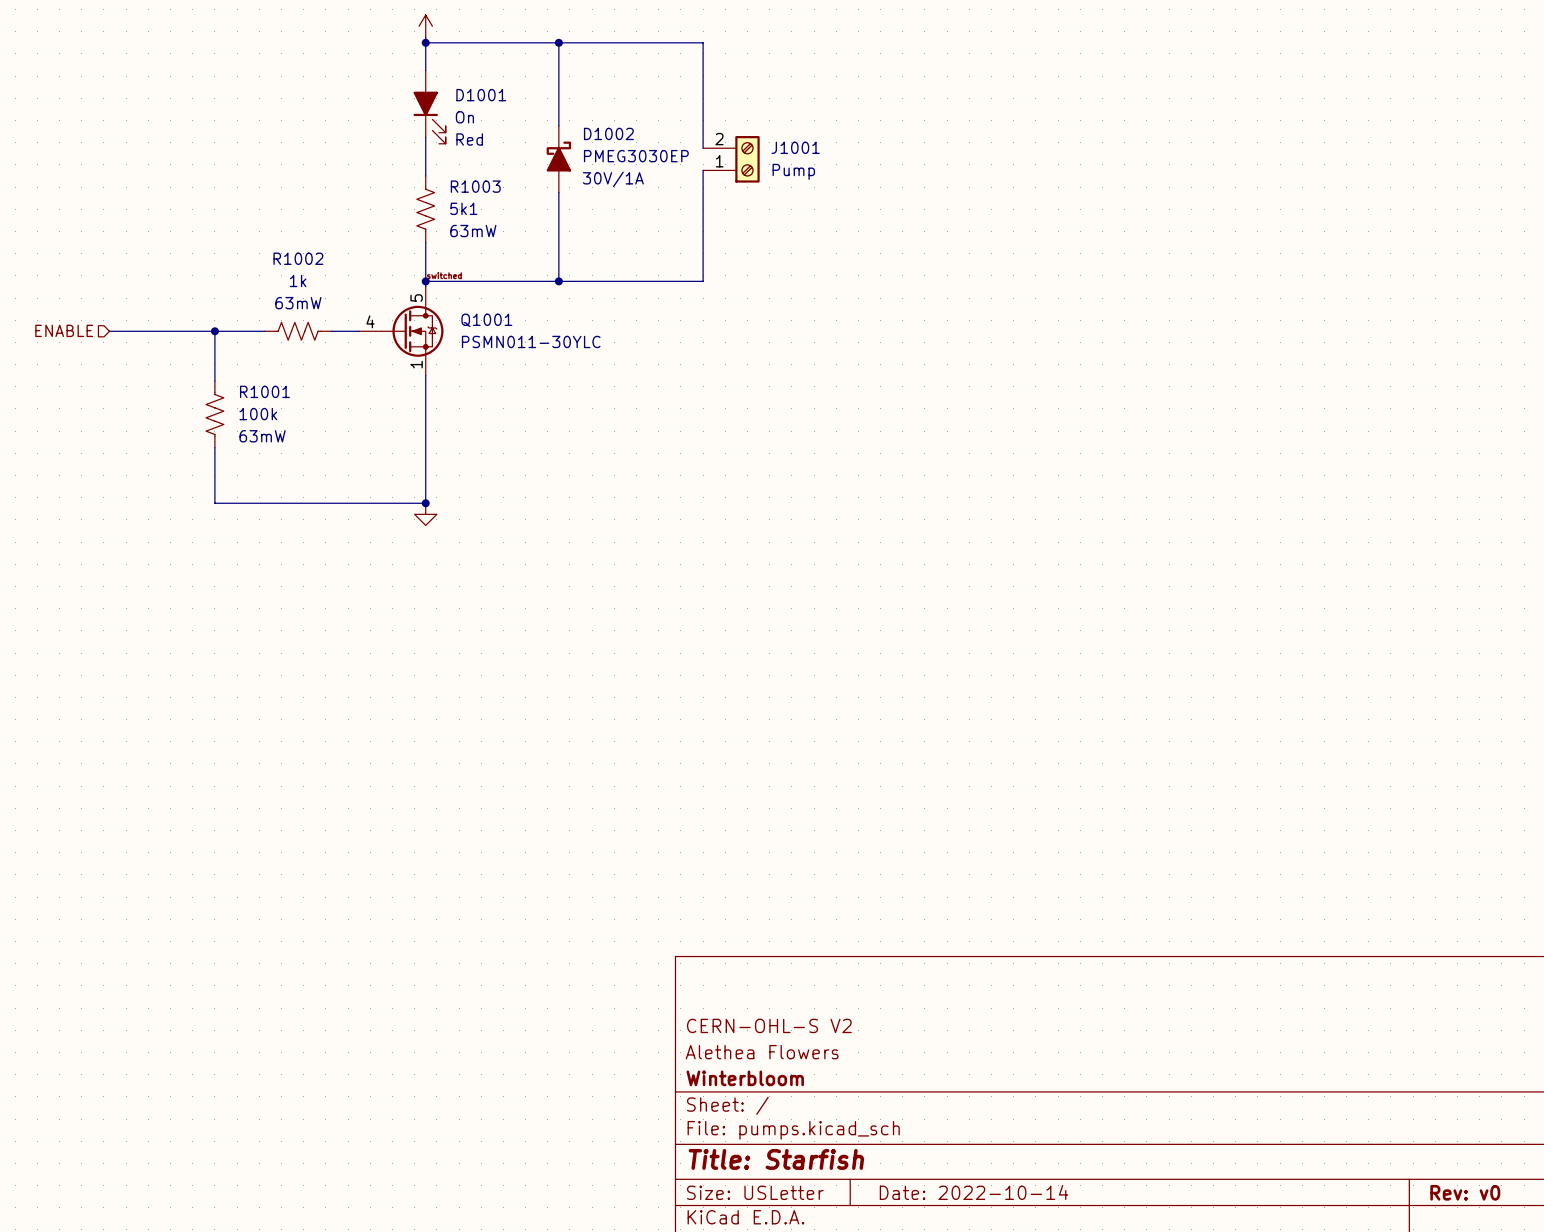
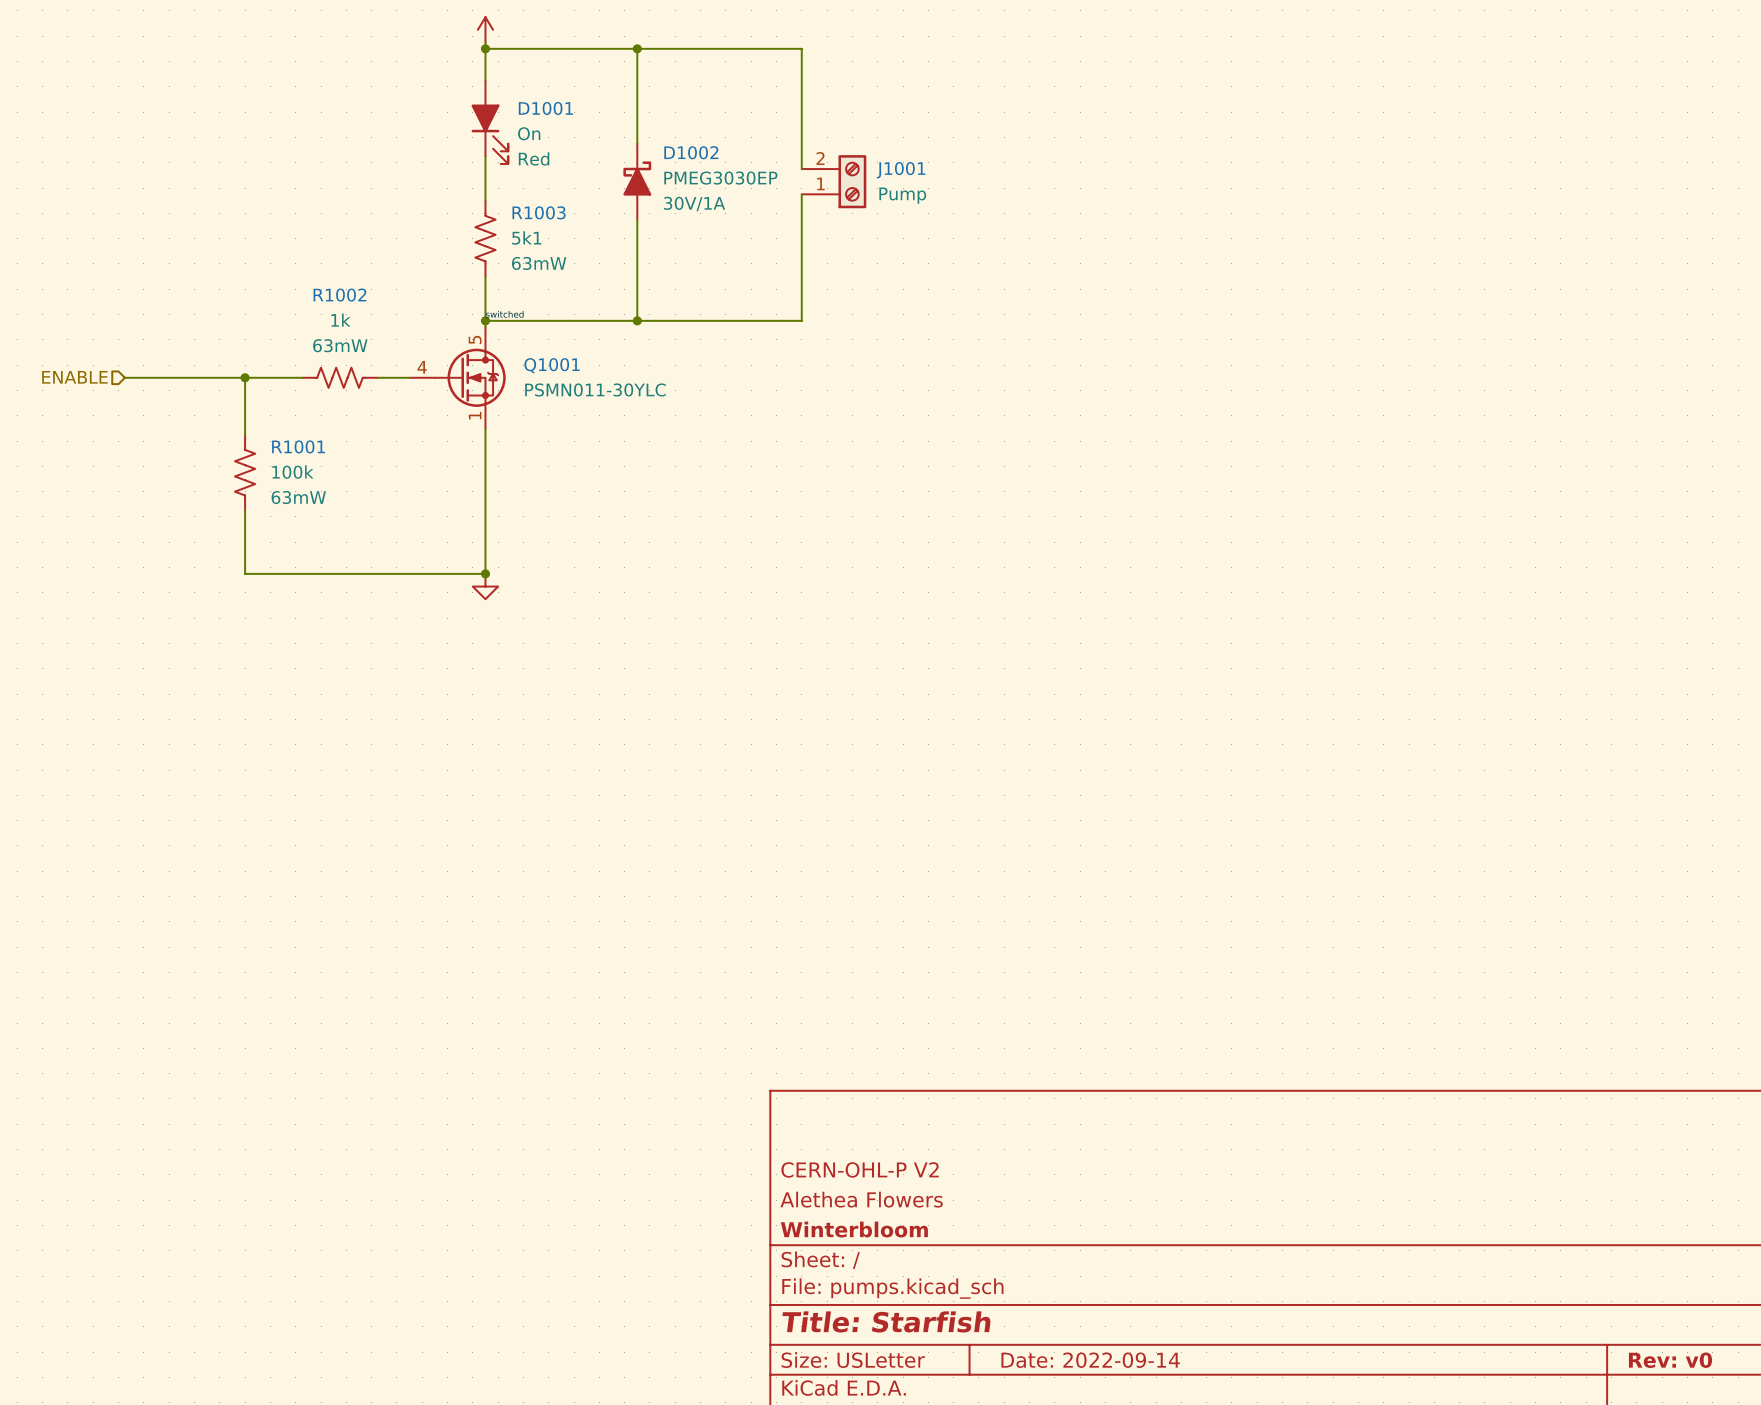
title block: CERN-OHL-S V2 (769, 1025) -> CERN-OHL-P V2 (860, 1169)
title block: Date: 2022-10-14 (974, 1192) -> Date: 2022-09-14 (1090, 1360)

